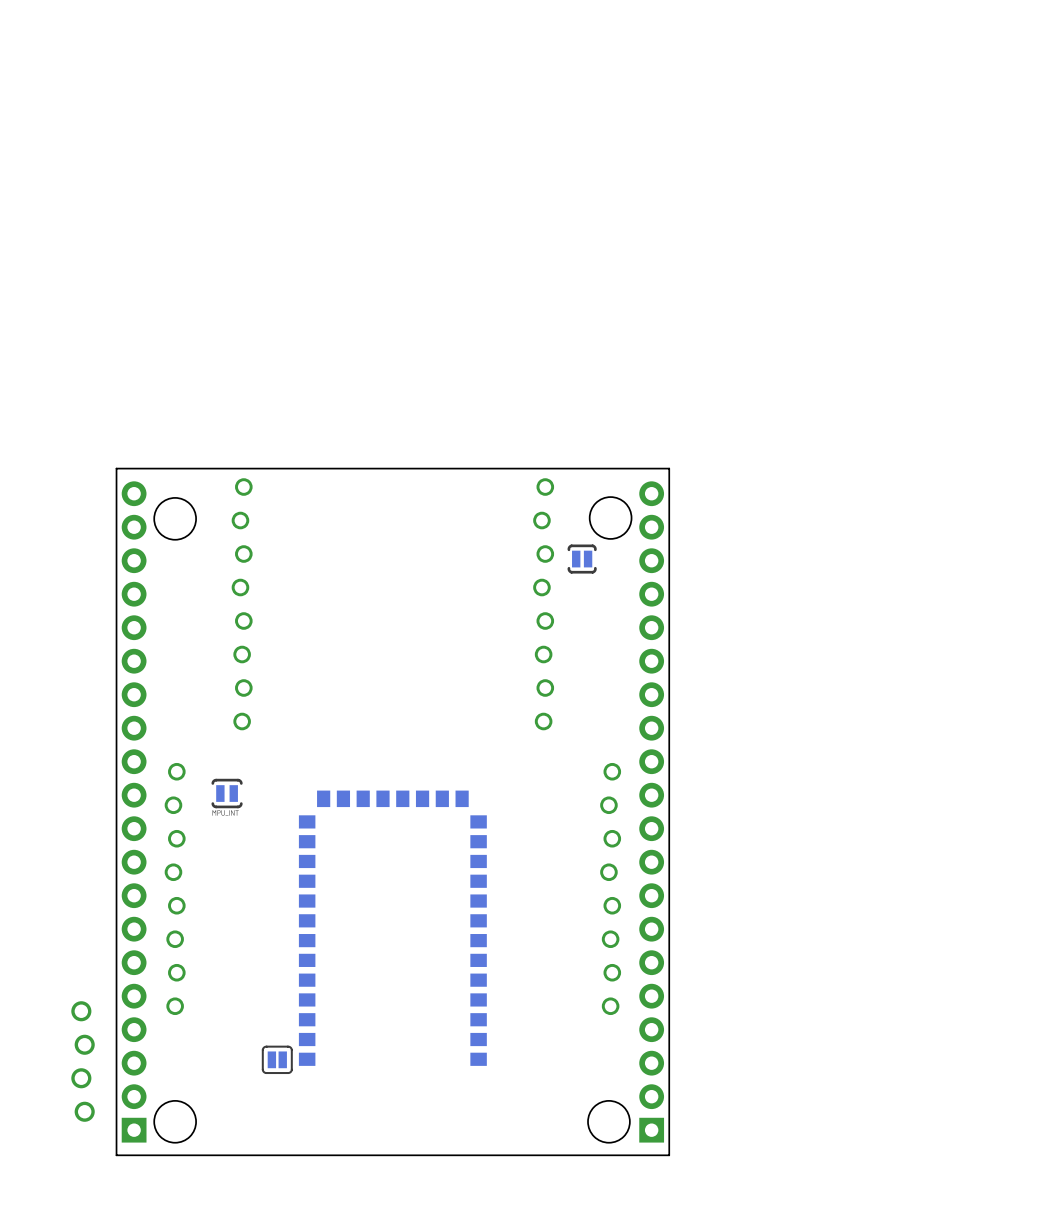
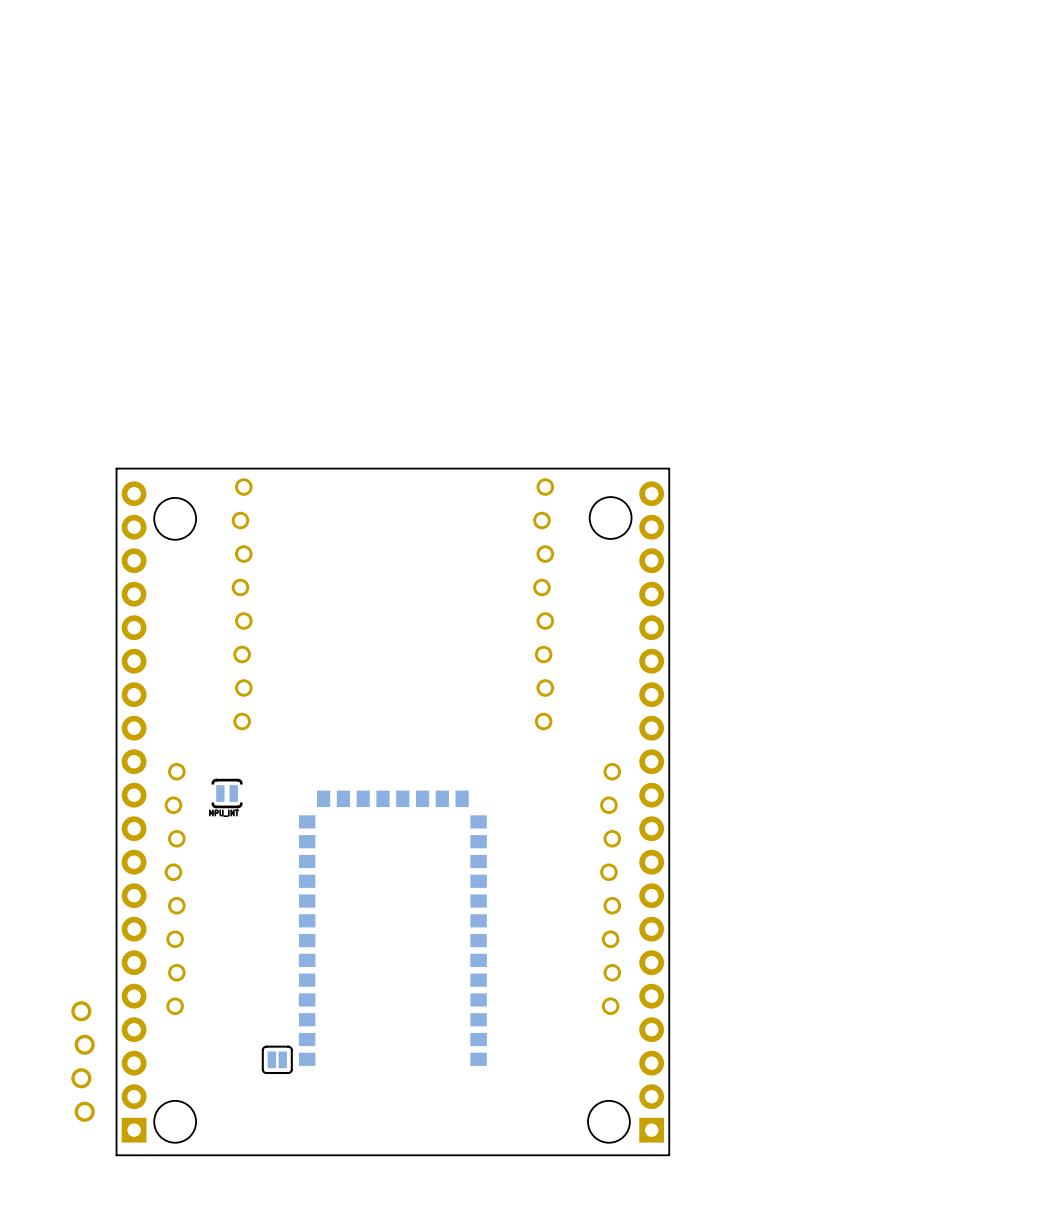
part: (582, 559) -> none

